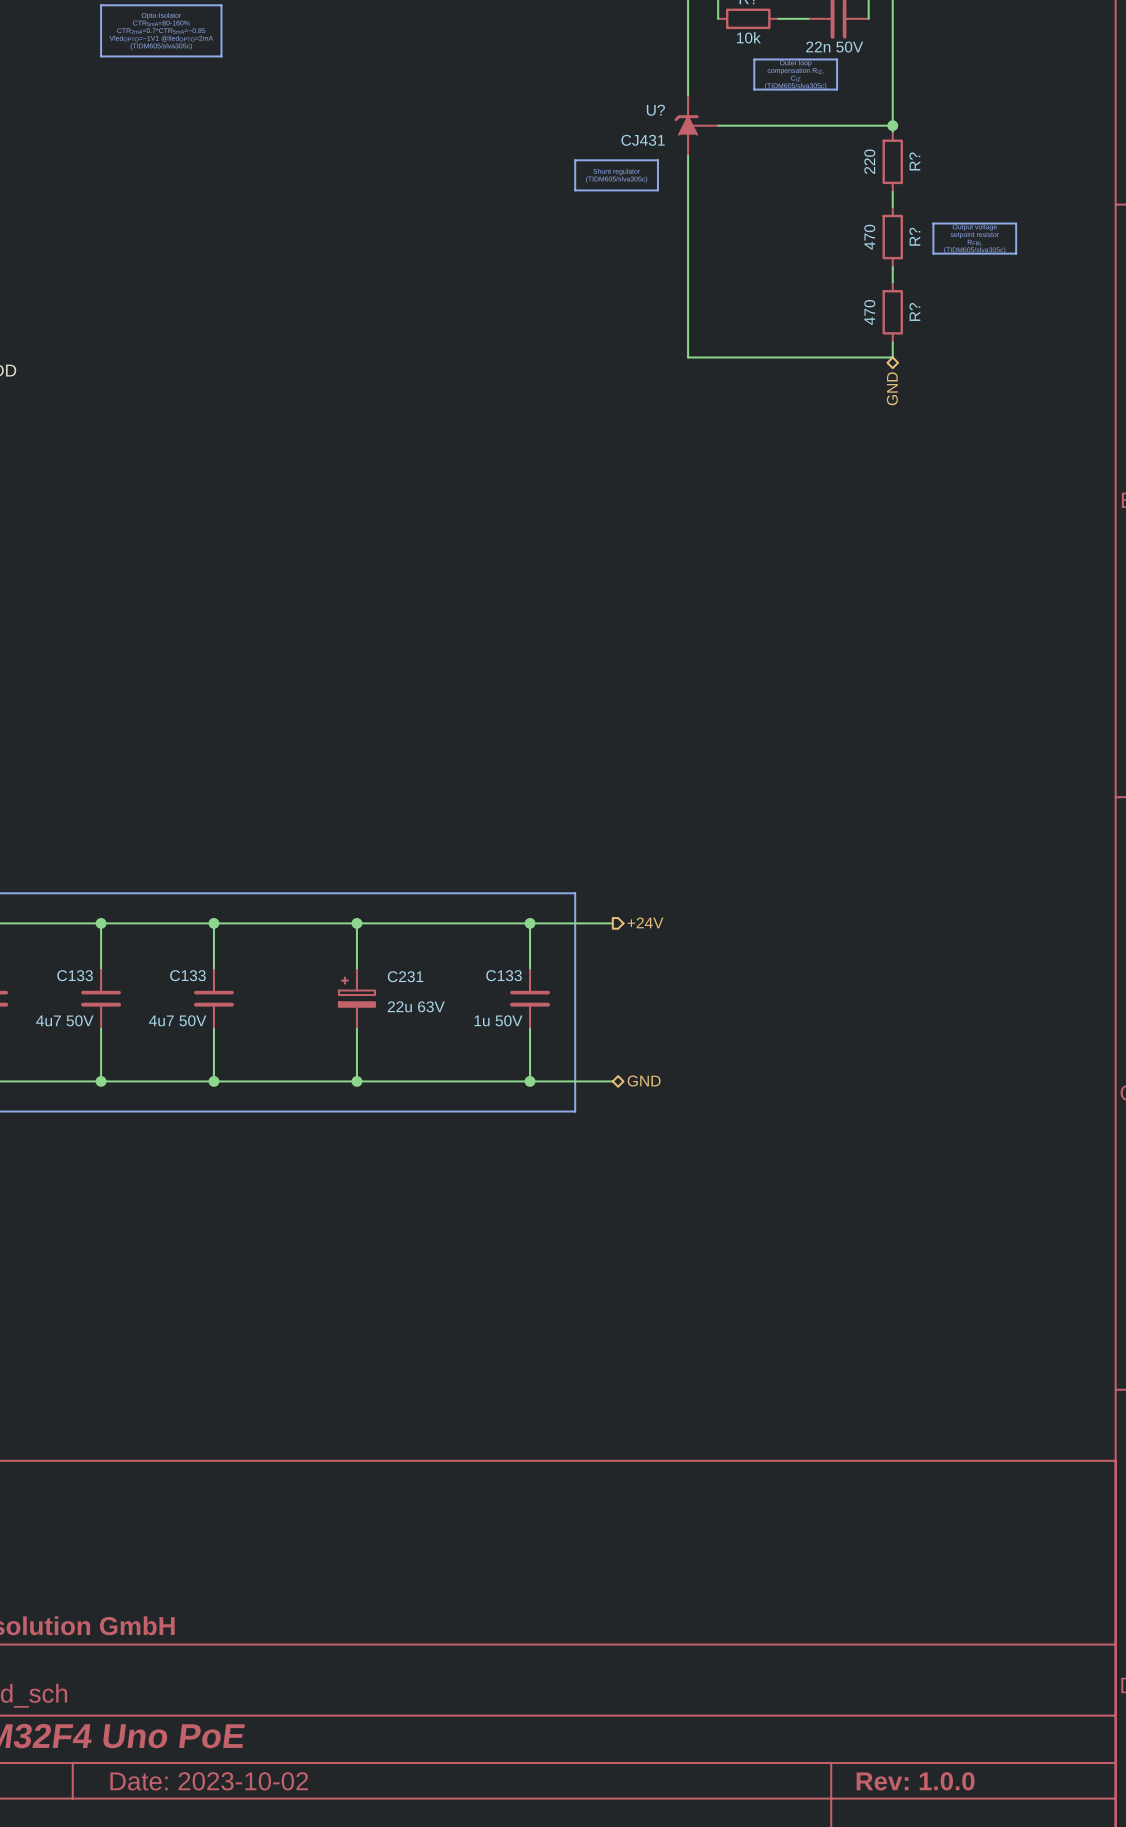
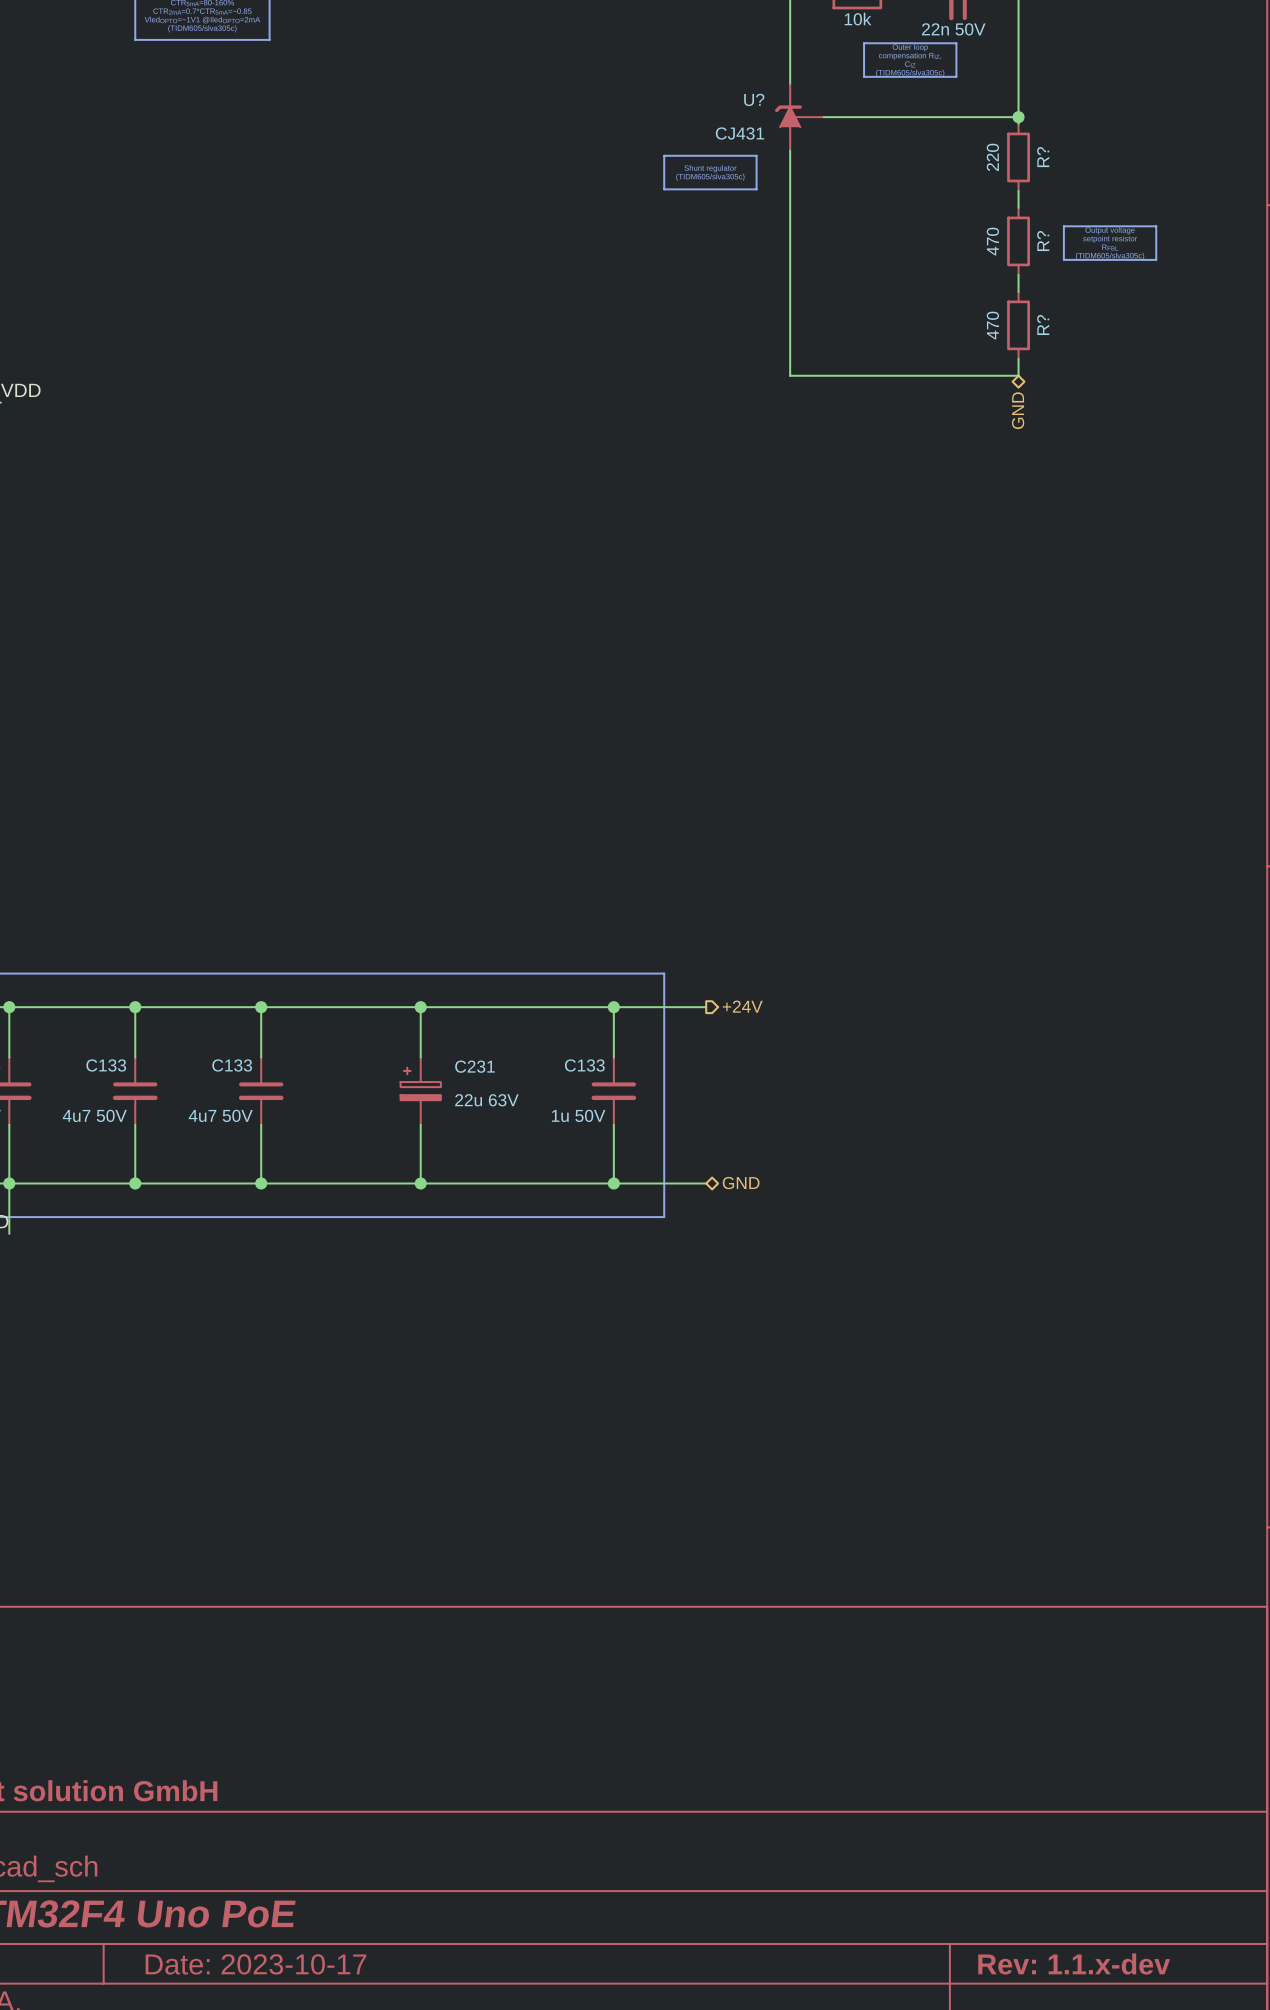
title block: Date: 2023-10-02 (209, 1781) -> Date: 2023-10-17 (255, 1964)
title block: Rev: 1.0.0 (915, 1781) -> Rev: 1.1.x-dev (1074, 1964)

